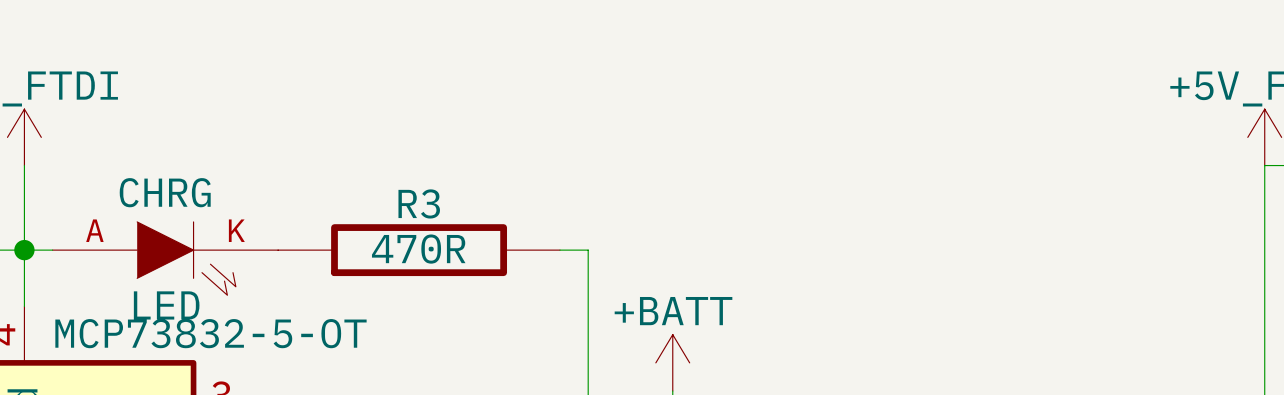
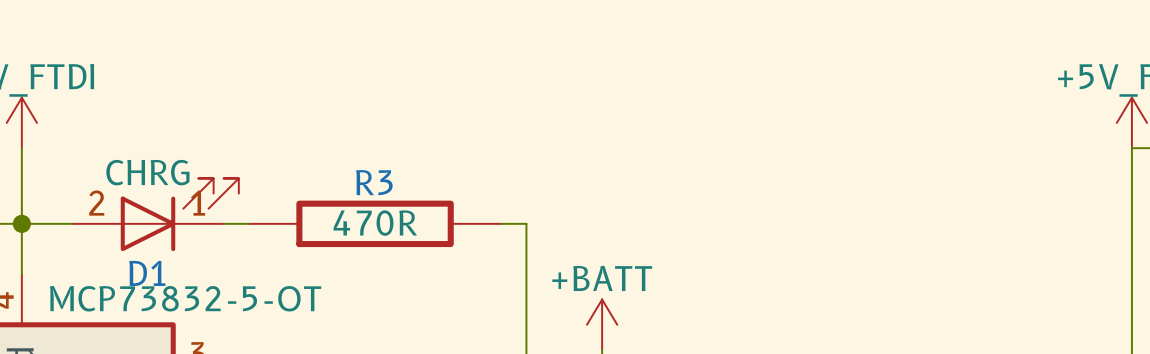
D1: none -> CHRG (155, 214)
CHRG: LED (165, 258) -> none

